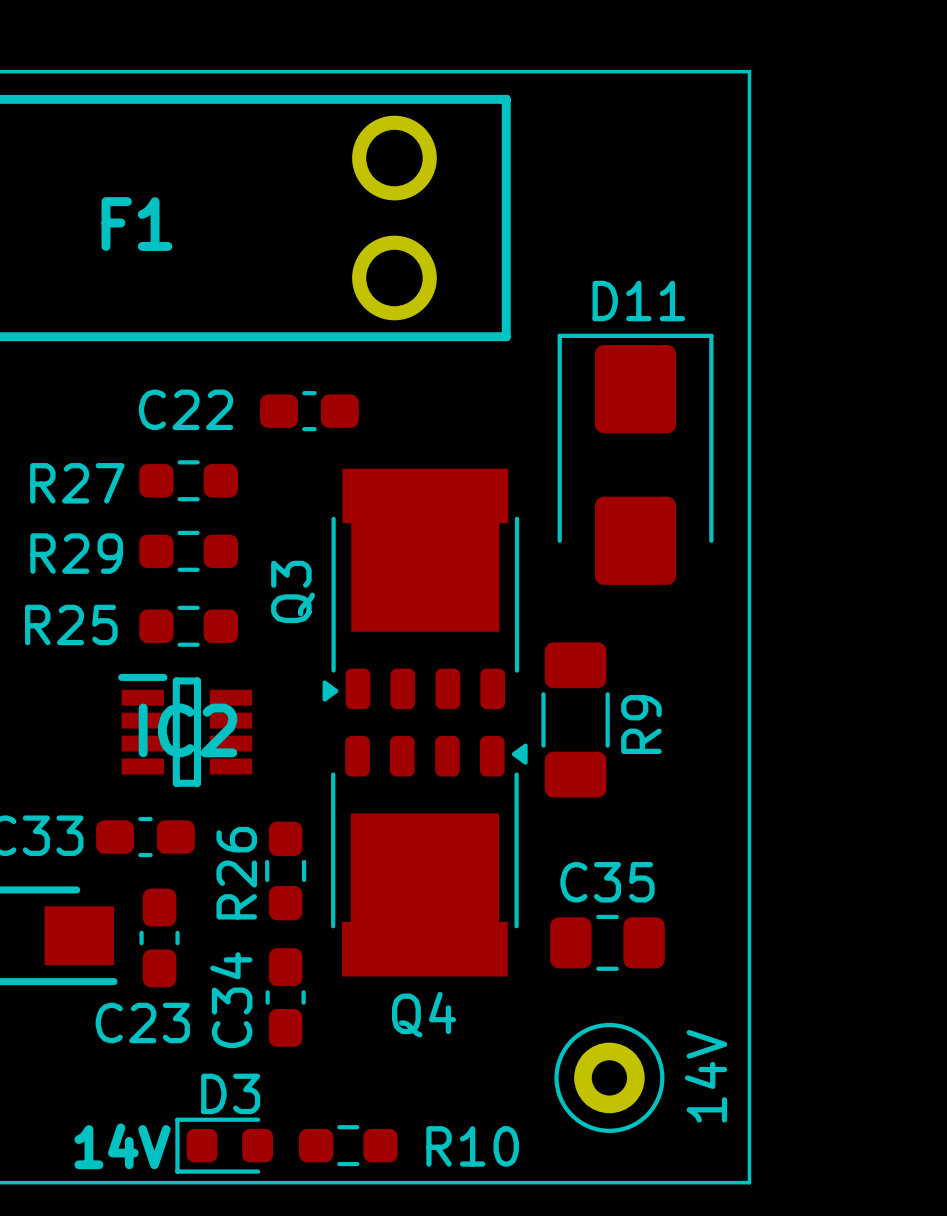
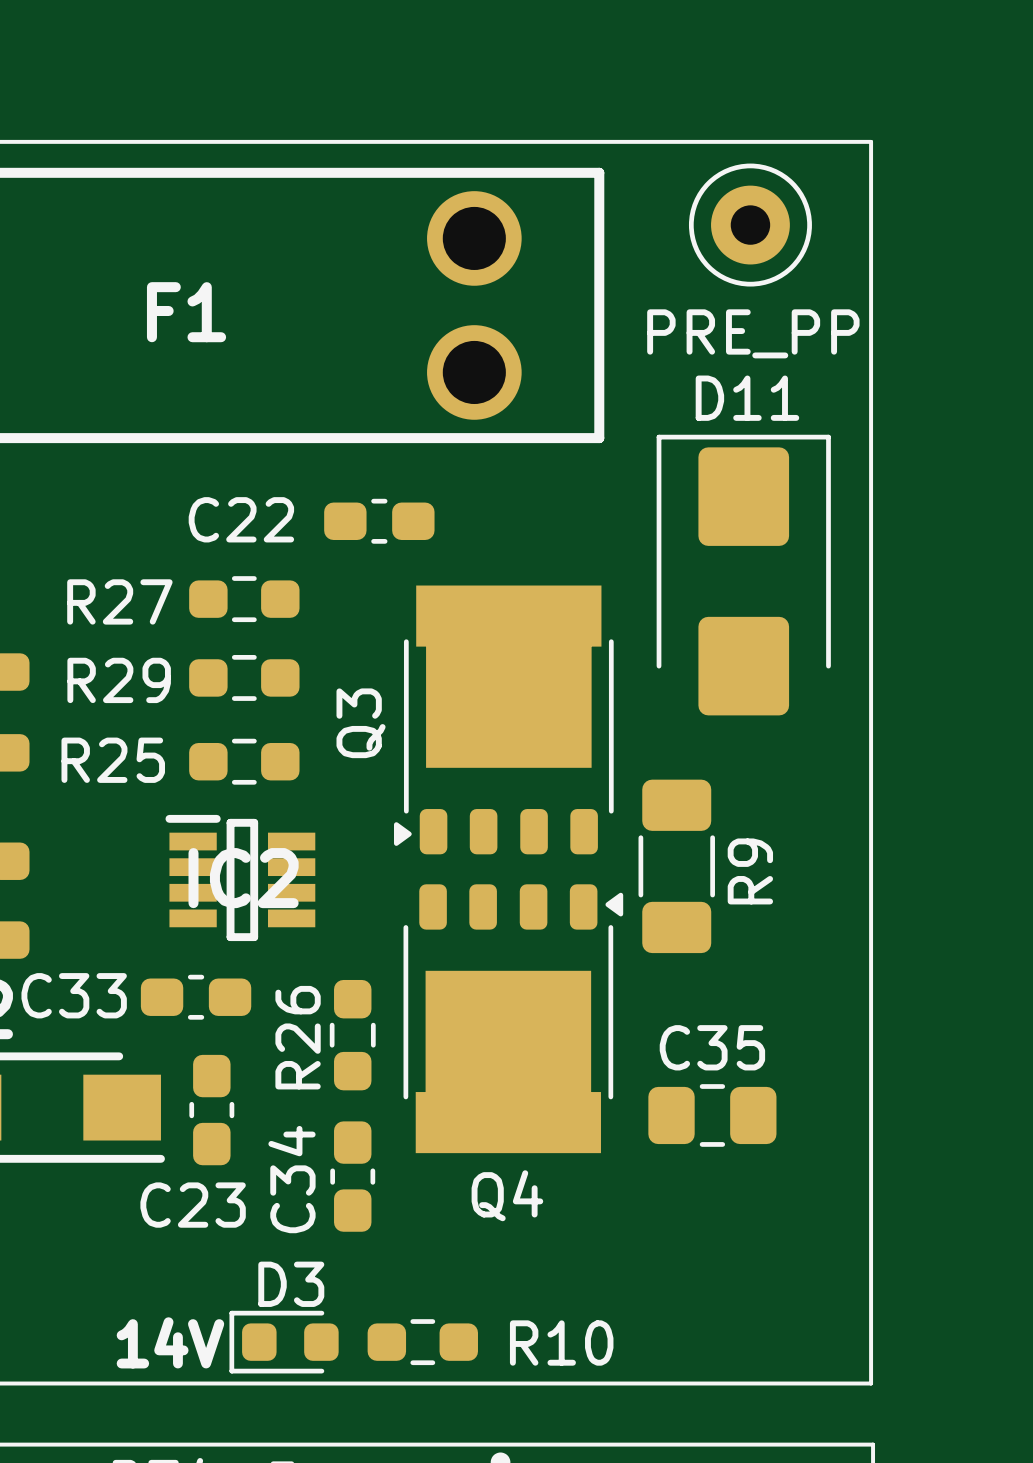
part: none -> PRE_PP (750, 225)
part: 14V (609, 1077) -> none

